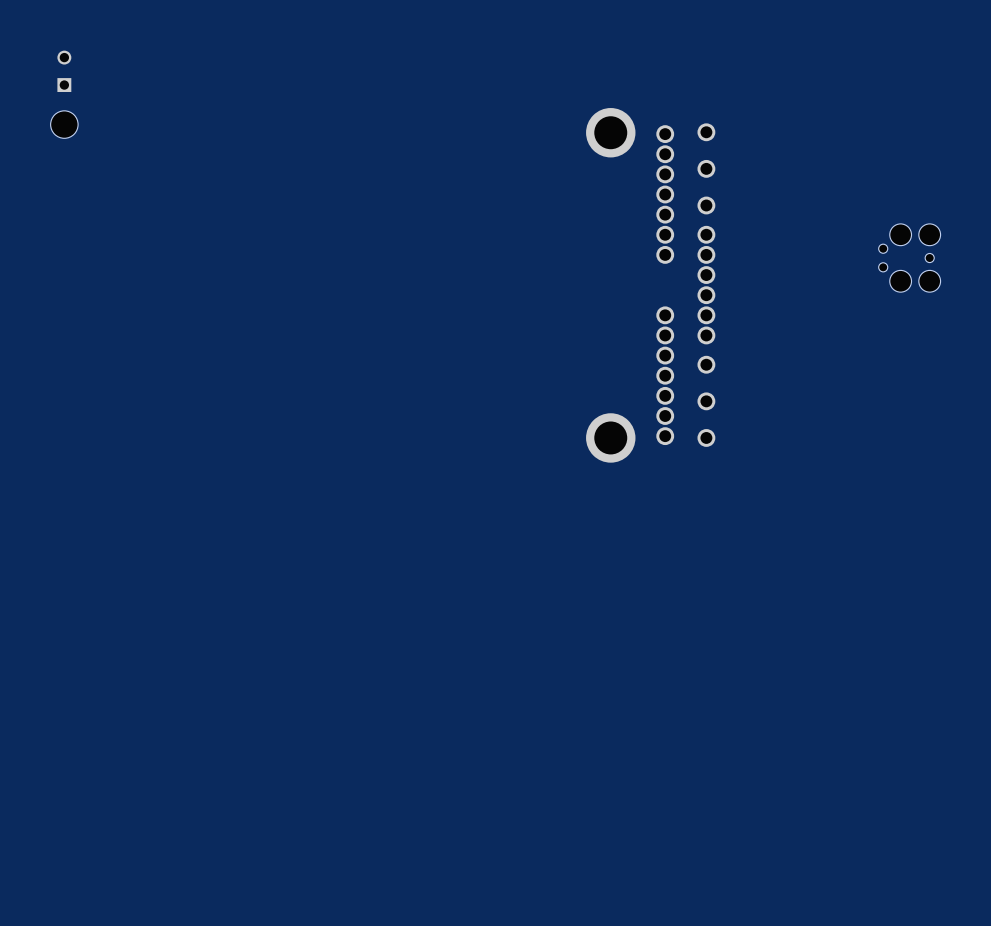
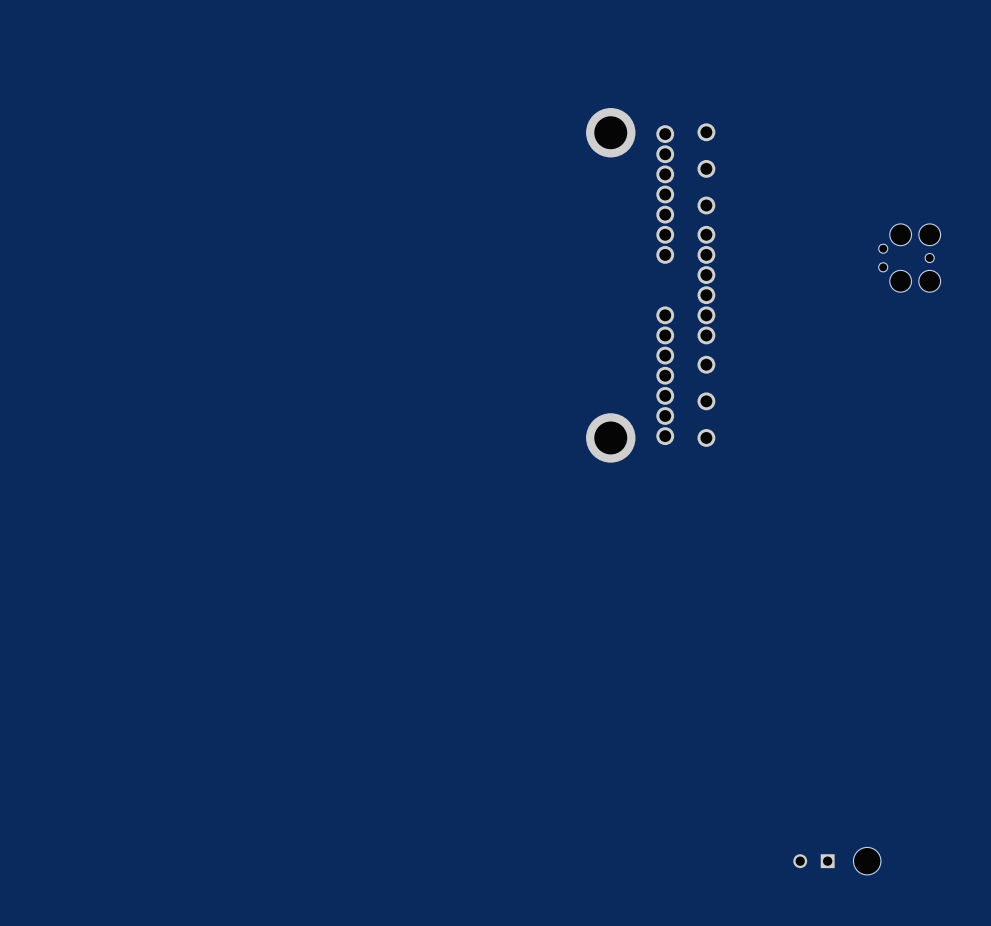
part: (64, 94) -> none
part: none -> (837, 861)

